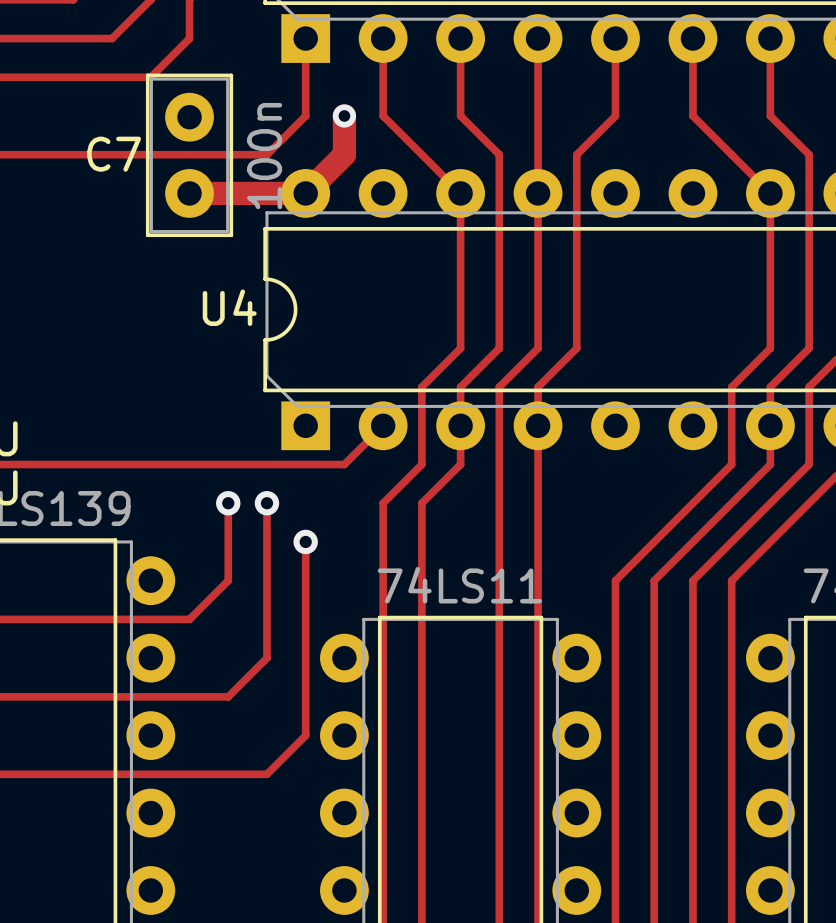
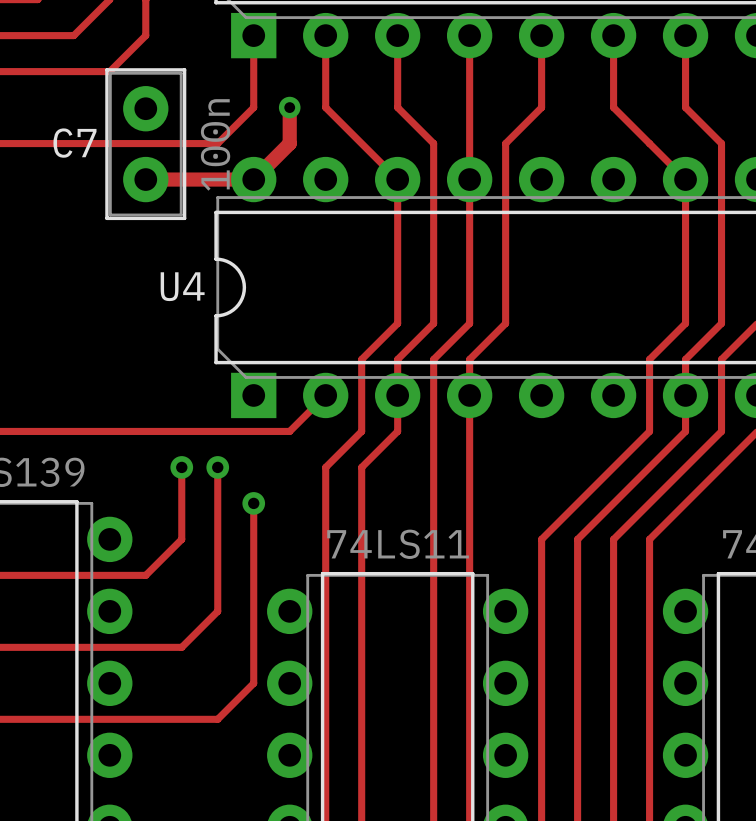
track width: thick (344, 115) (344, 154) (305, 193) (189, 193) -> thin (289, 107) (289, 143) (253, 179) (145, 179)

